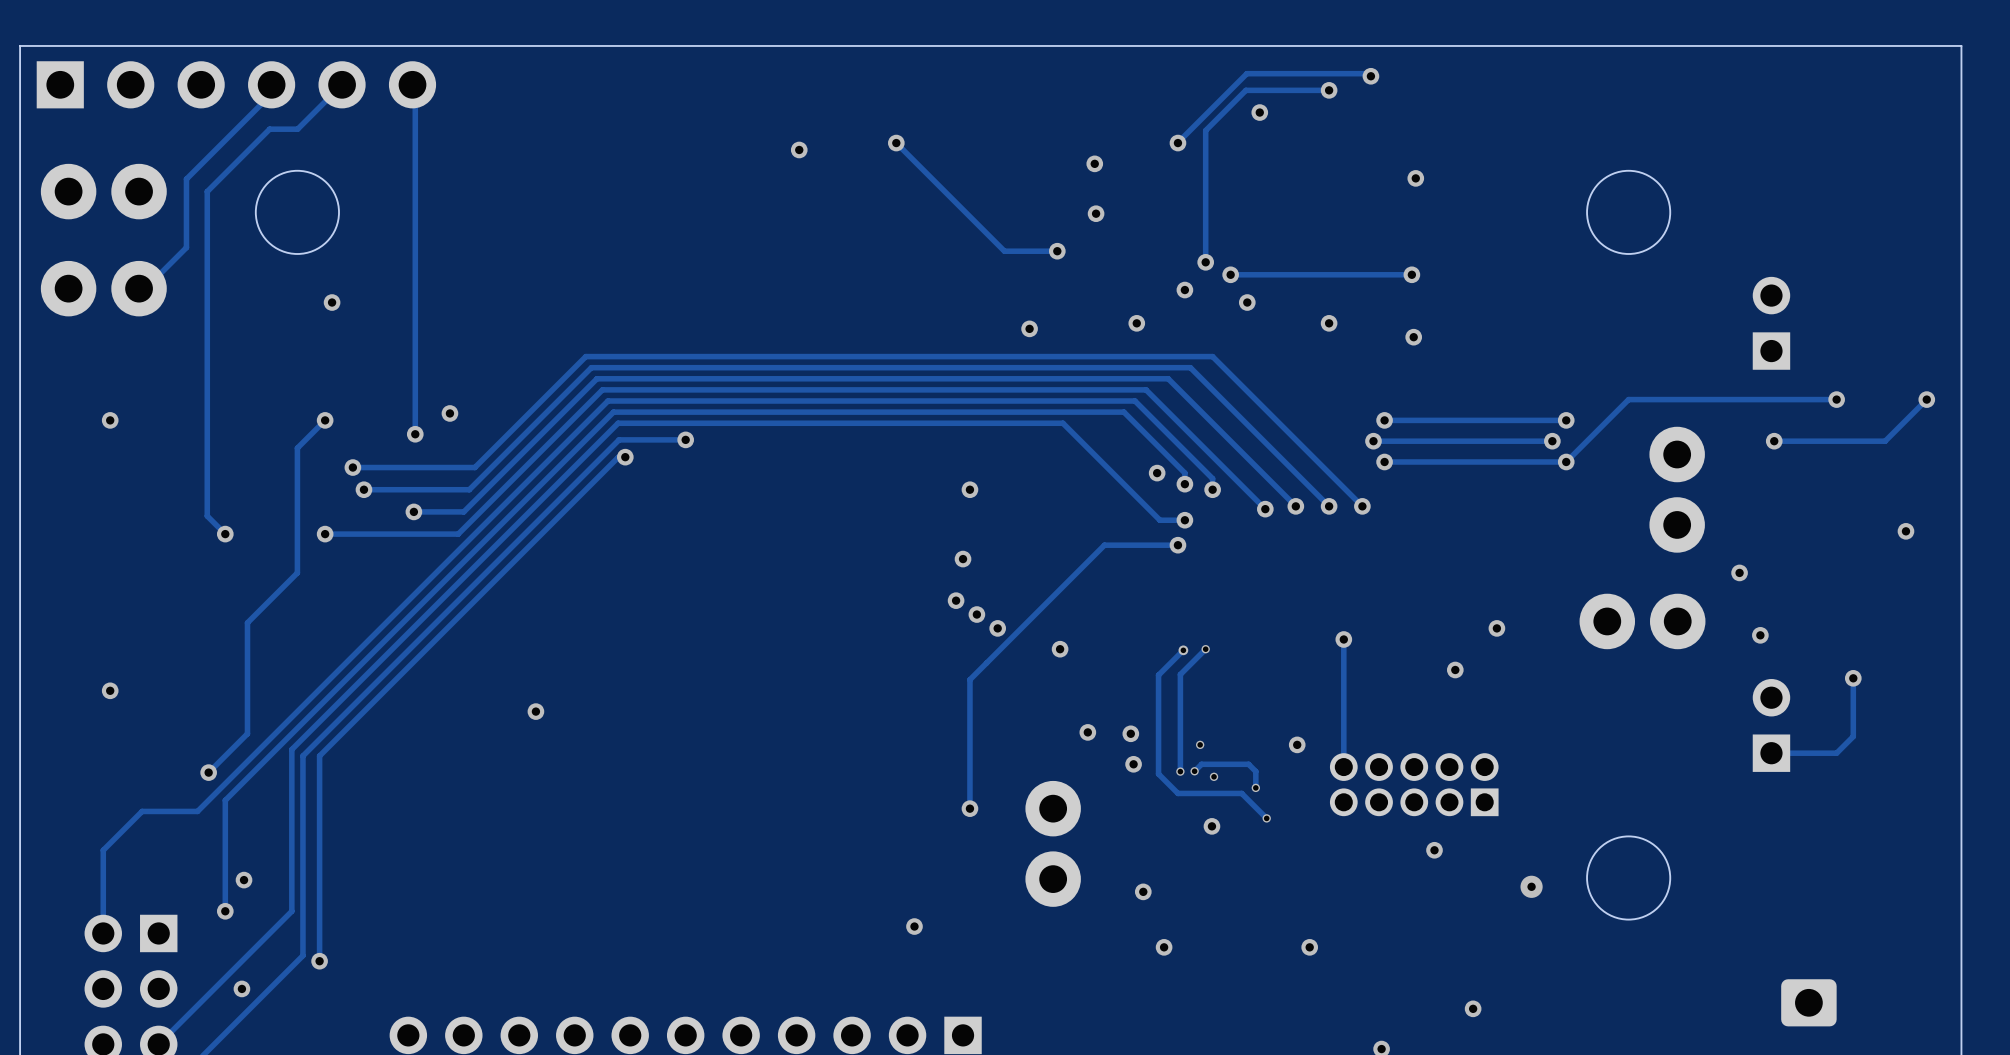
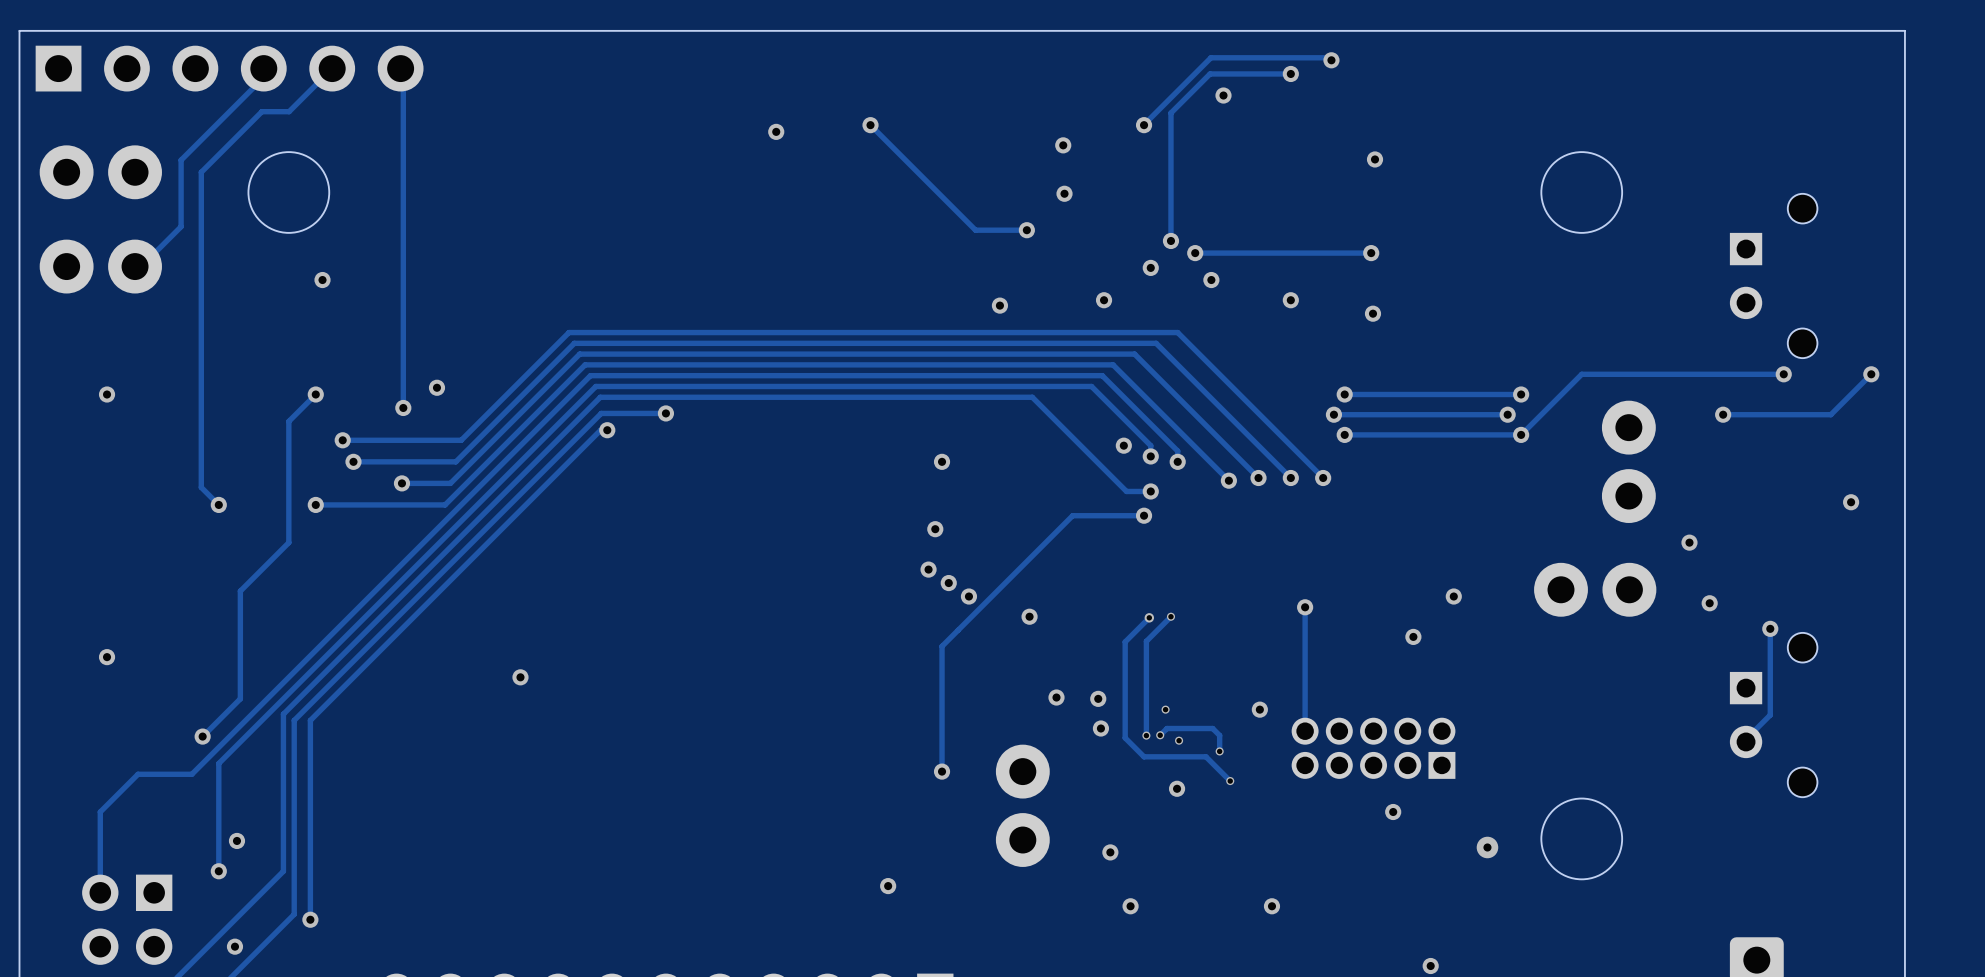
part: none -> (1773, 275)
part: (1771, 323) -> none
track: none -> (1770, 628) (1770, 715) (1743, 741) (1759, 741)
track: (1853, 678) (1853, 736) (1836, 753) (1771, 753) -> none
via position: (1853, 678) -> (1770, 628)
part: (1771, 725) -> none
part: none -> (1773, 715)

